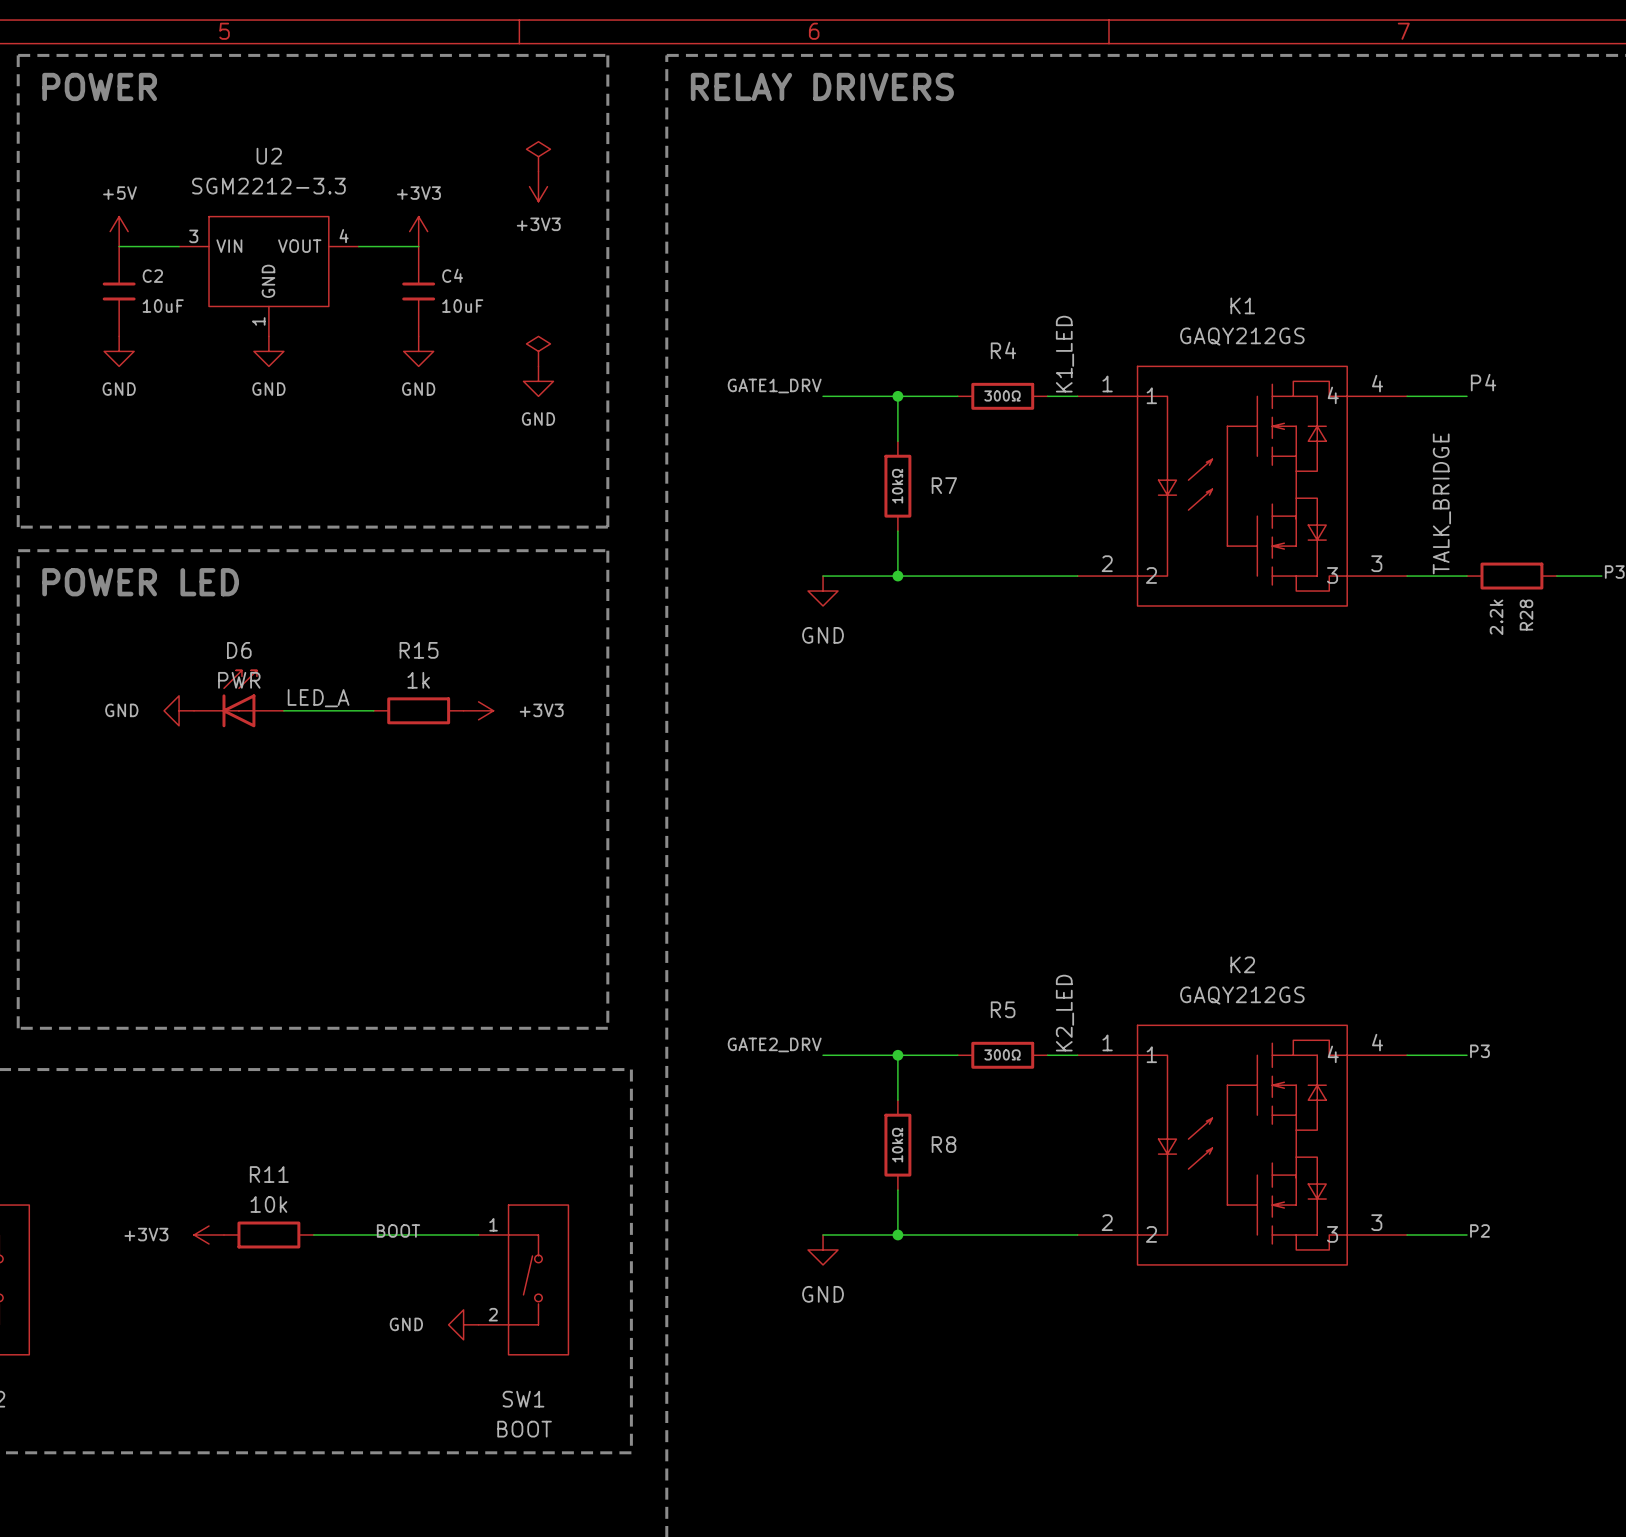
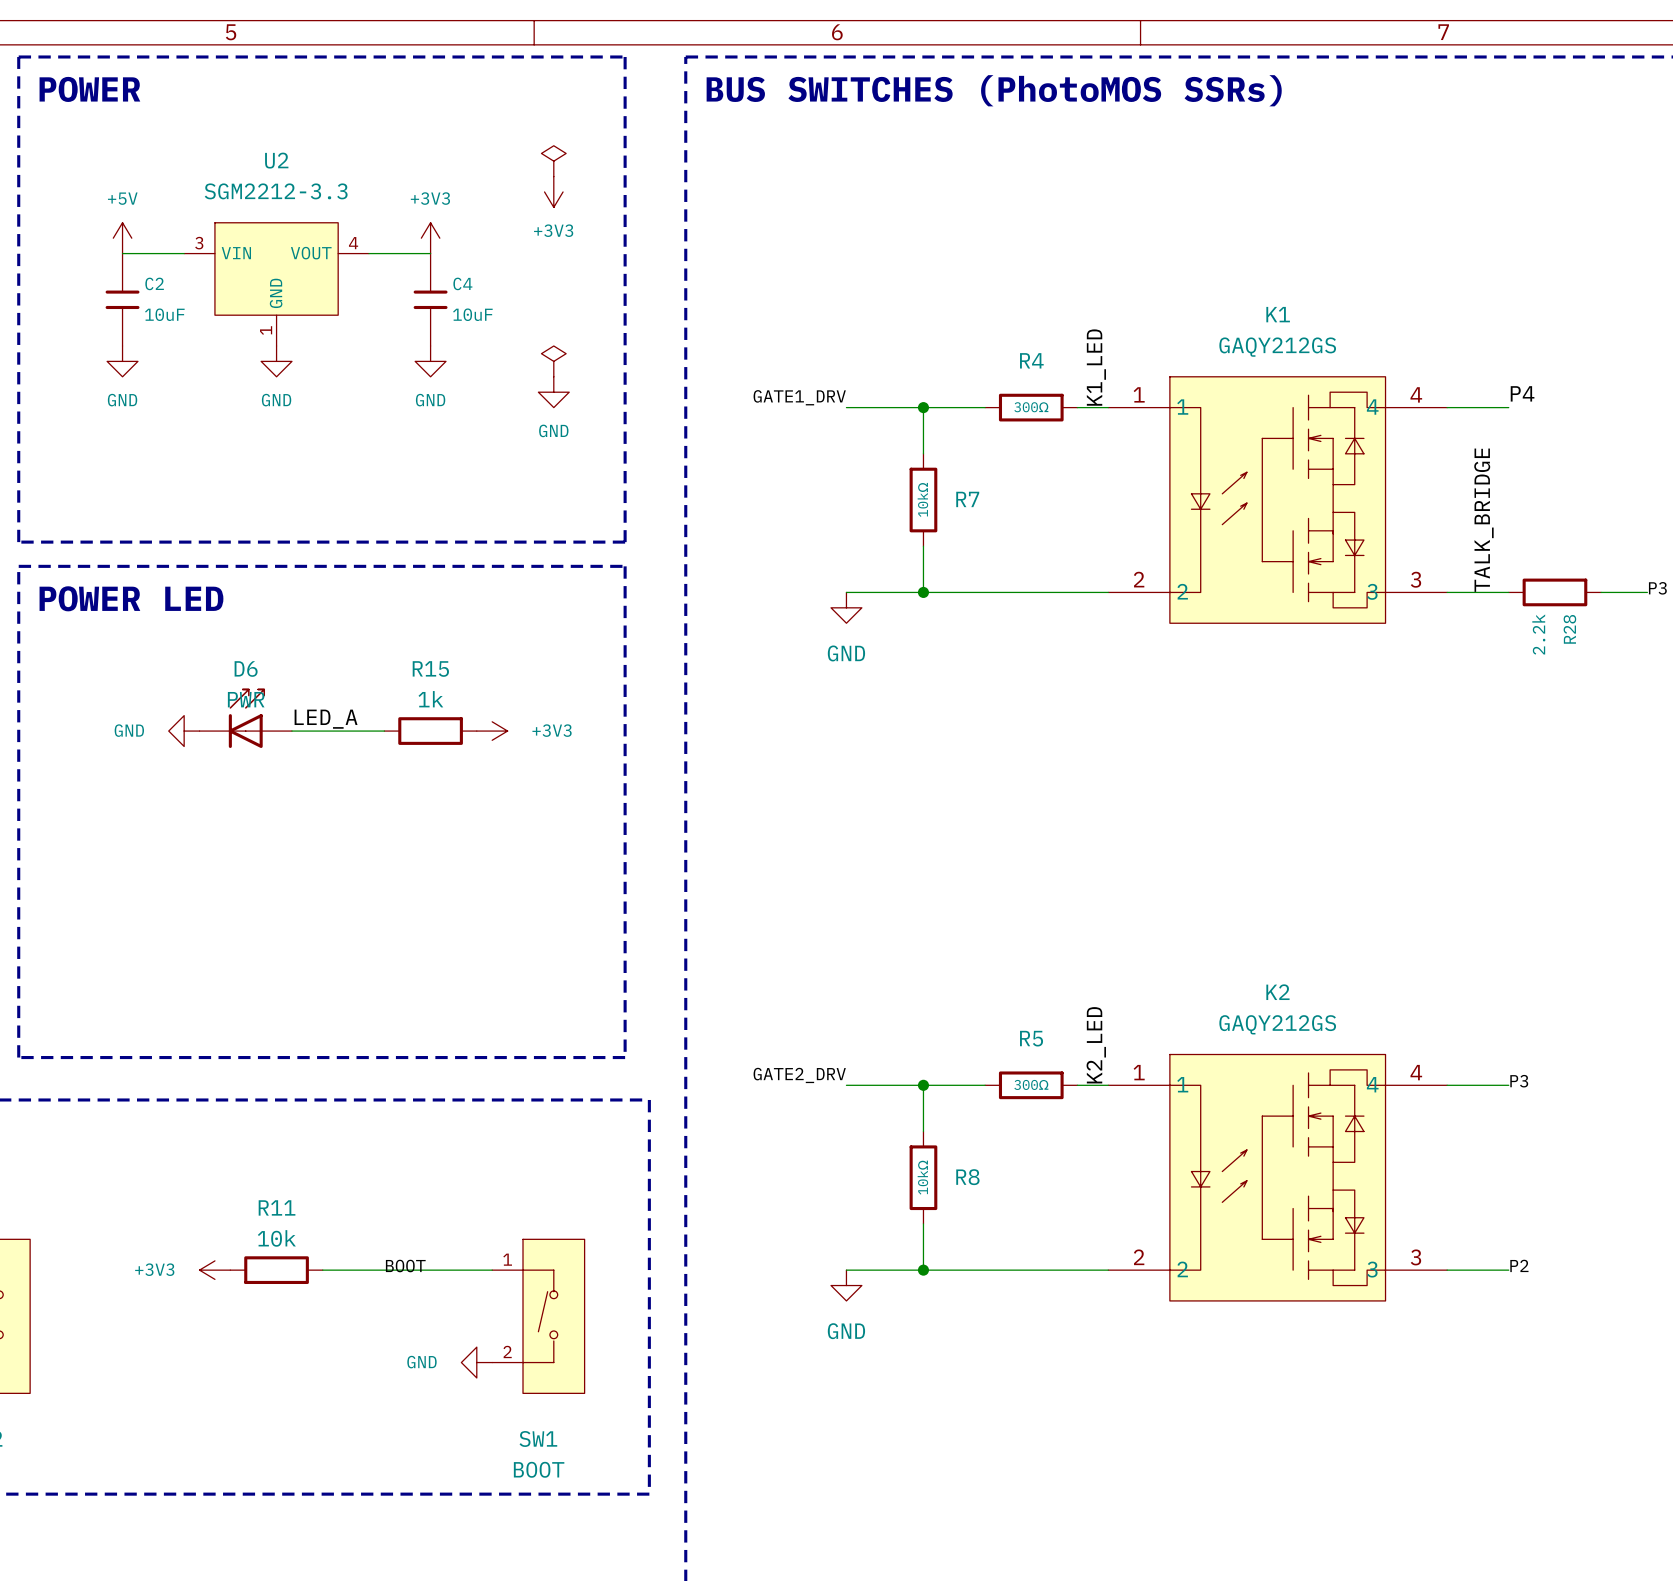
text: RELAY DRIVERS (822, 86) -> BUS SWITCHES (PhotoMOS SSRs) (994, 90)

